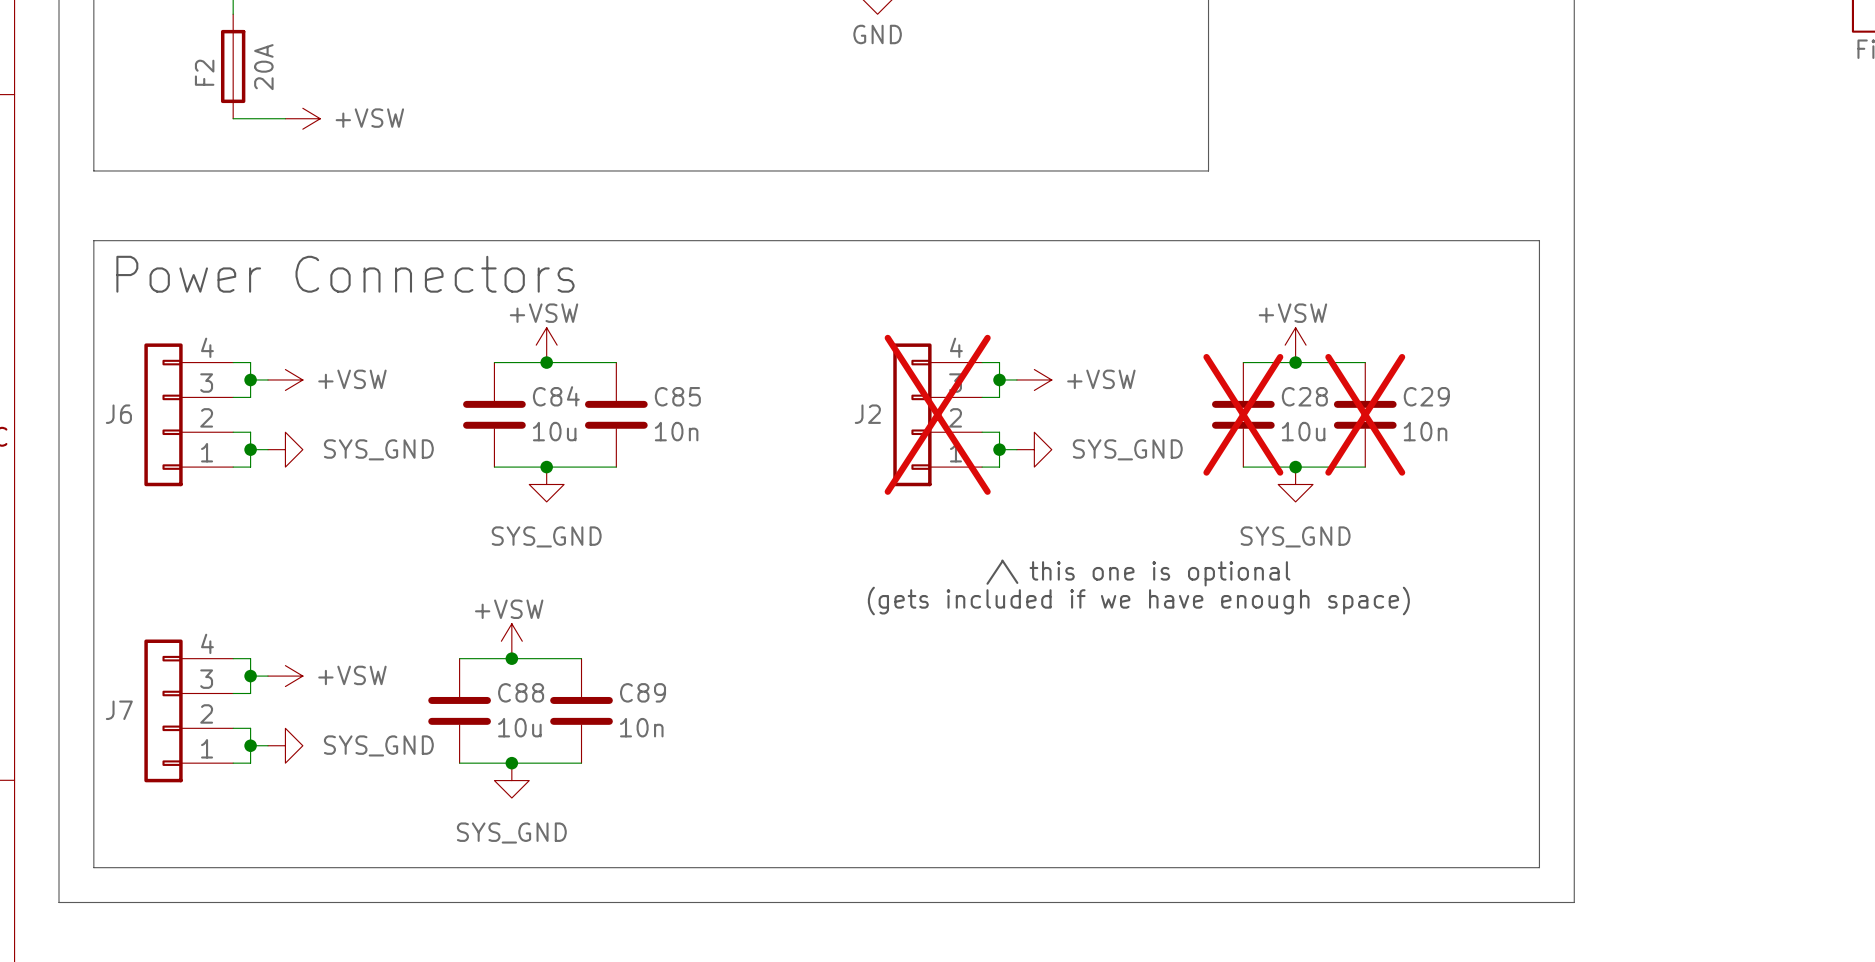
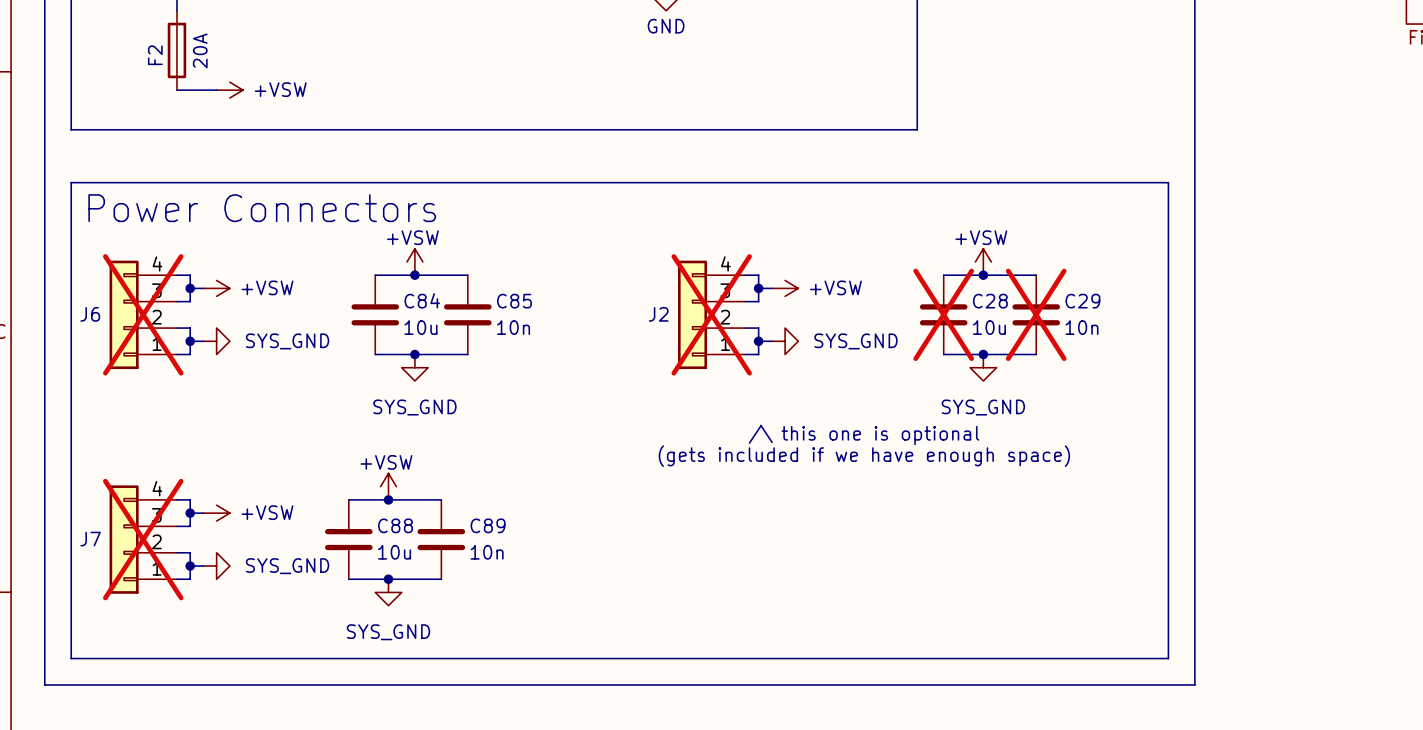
J6 do-not-place cross: none -> (143, 314)
J7 do-not-place cross: none -> (143, 539)

